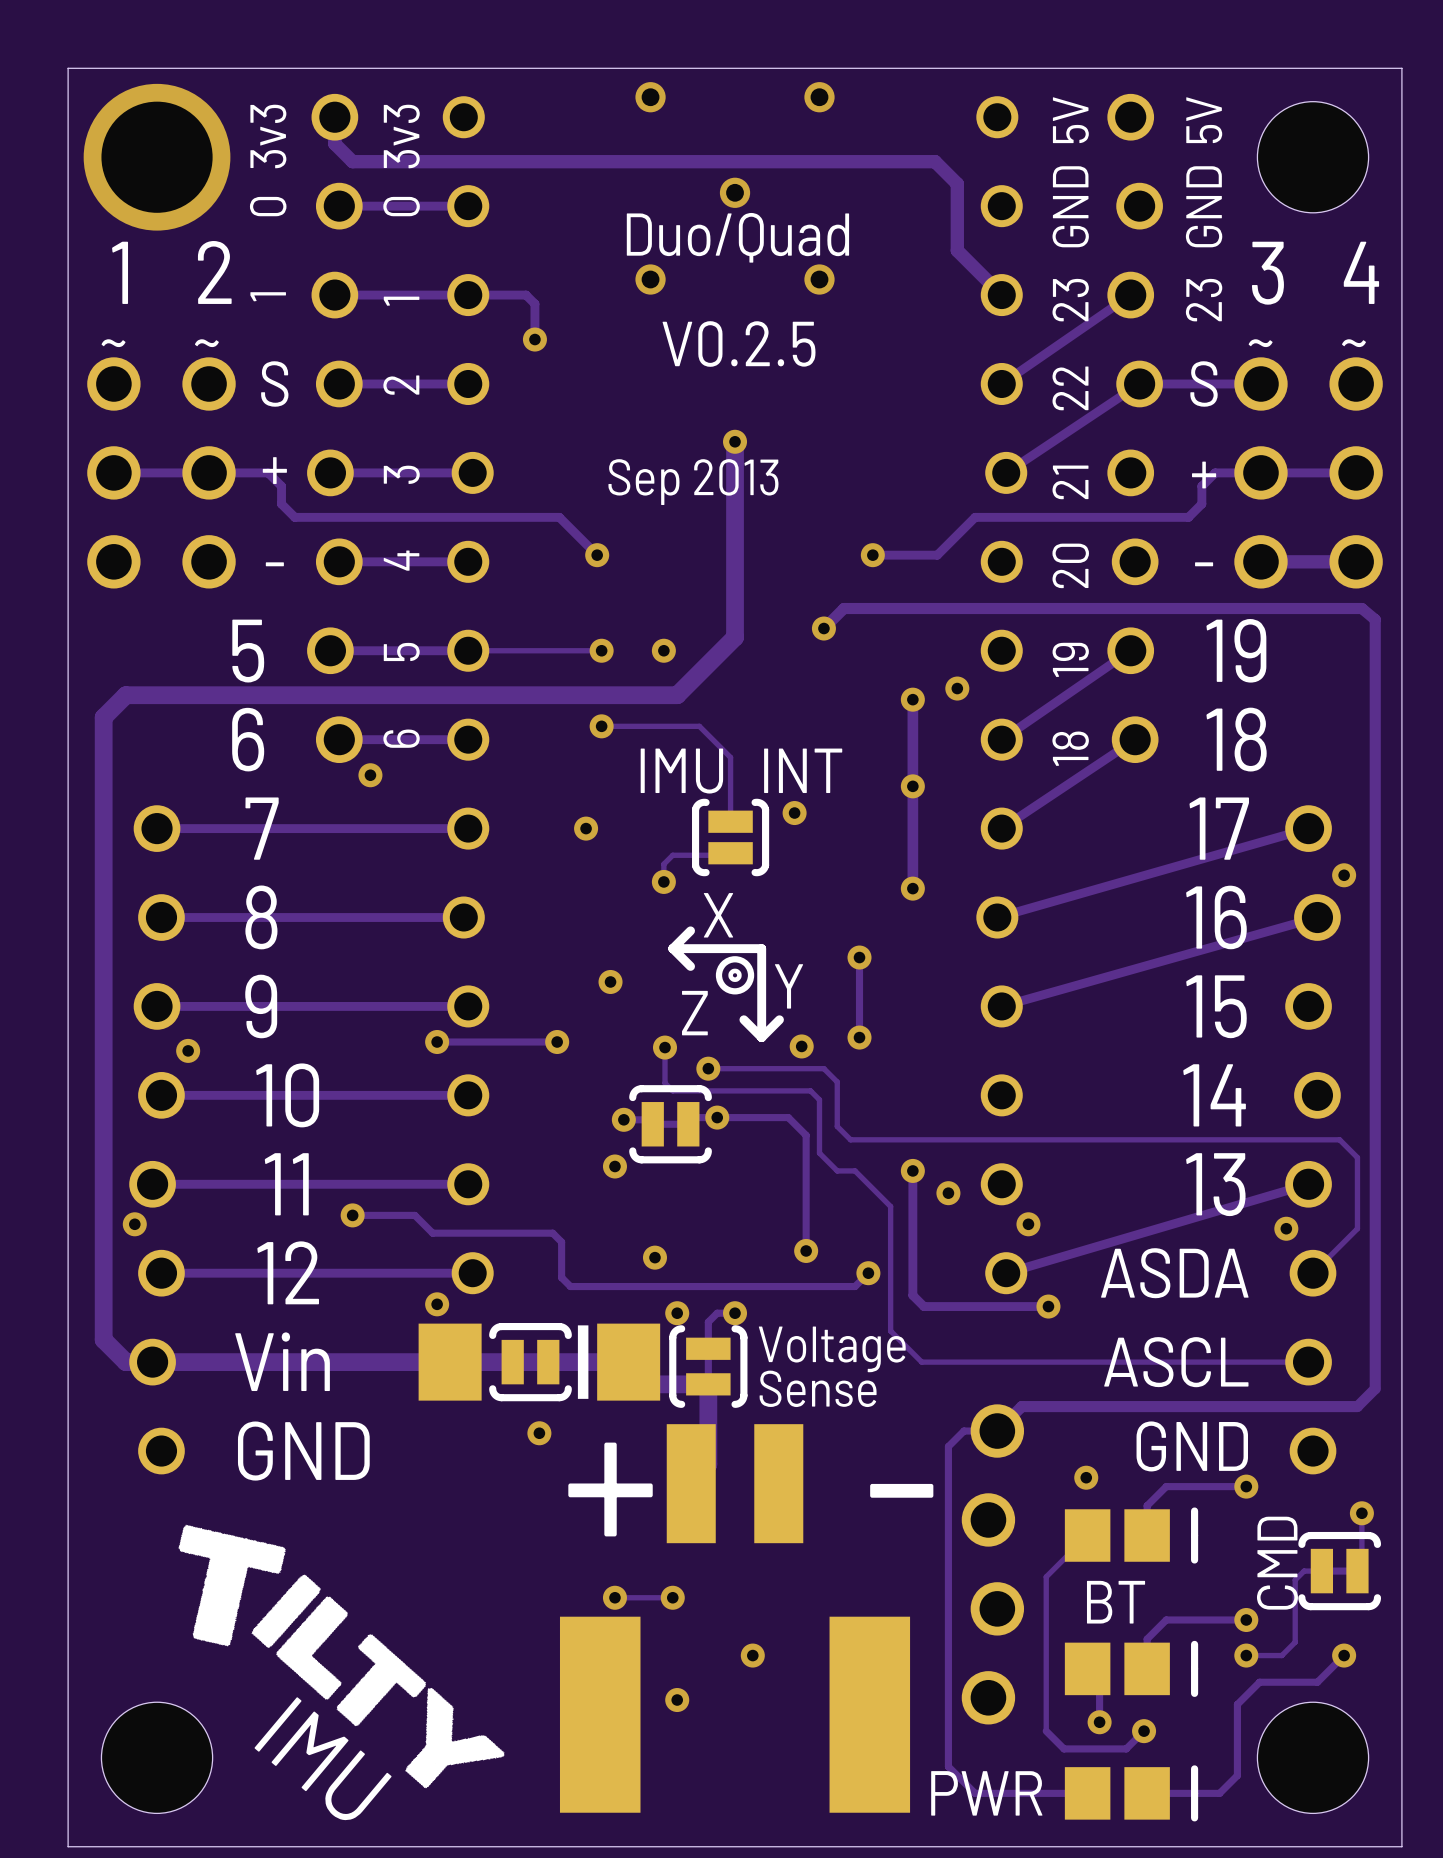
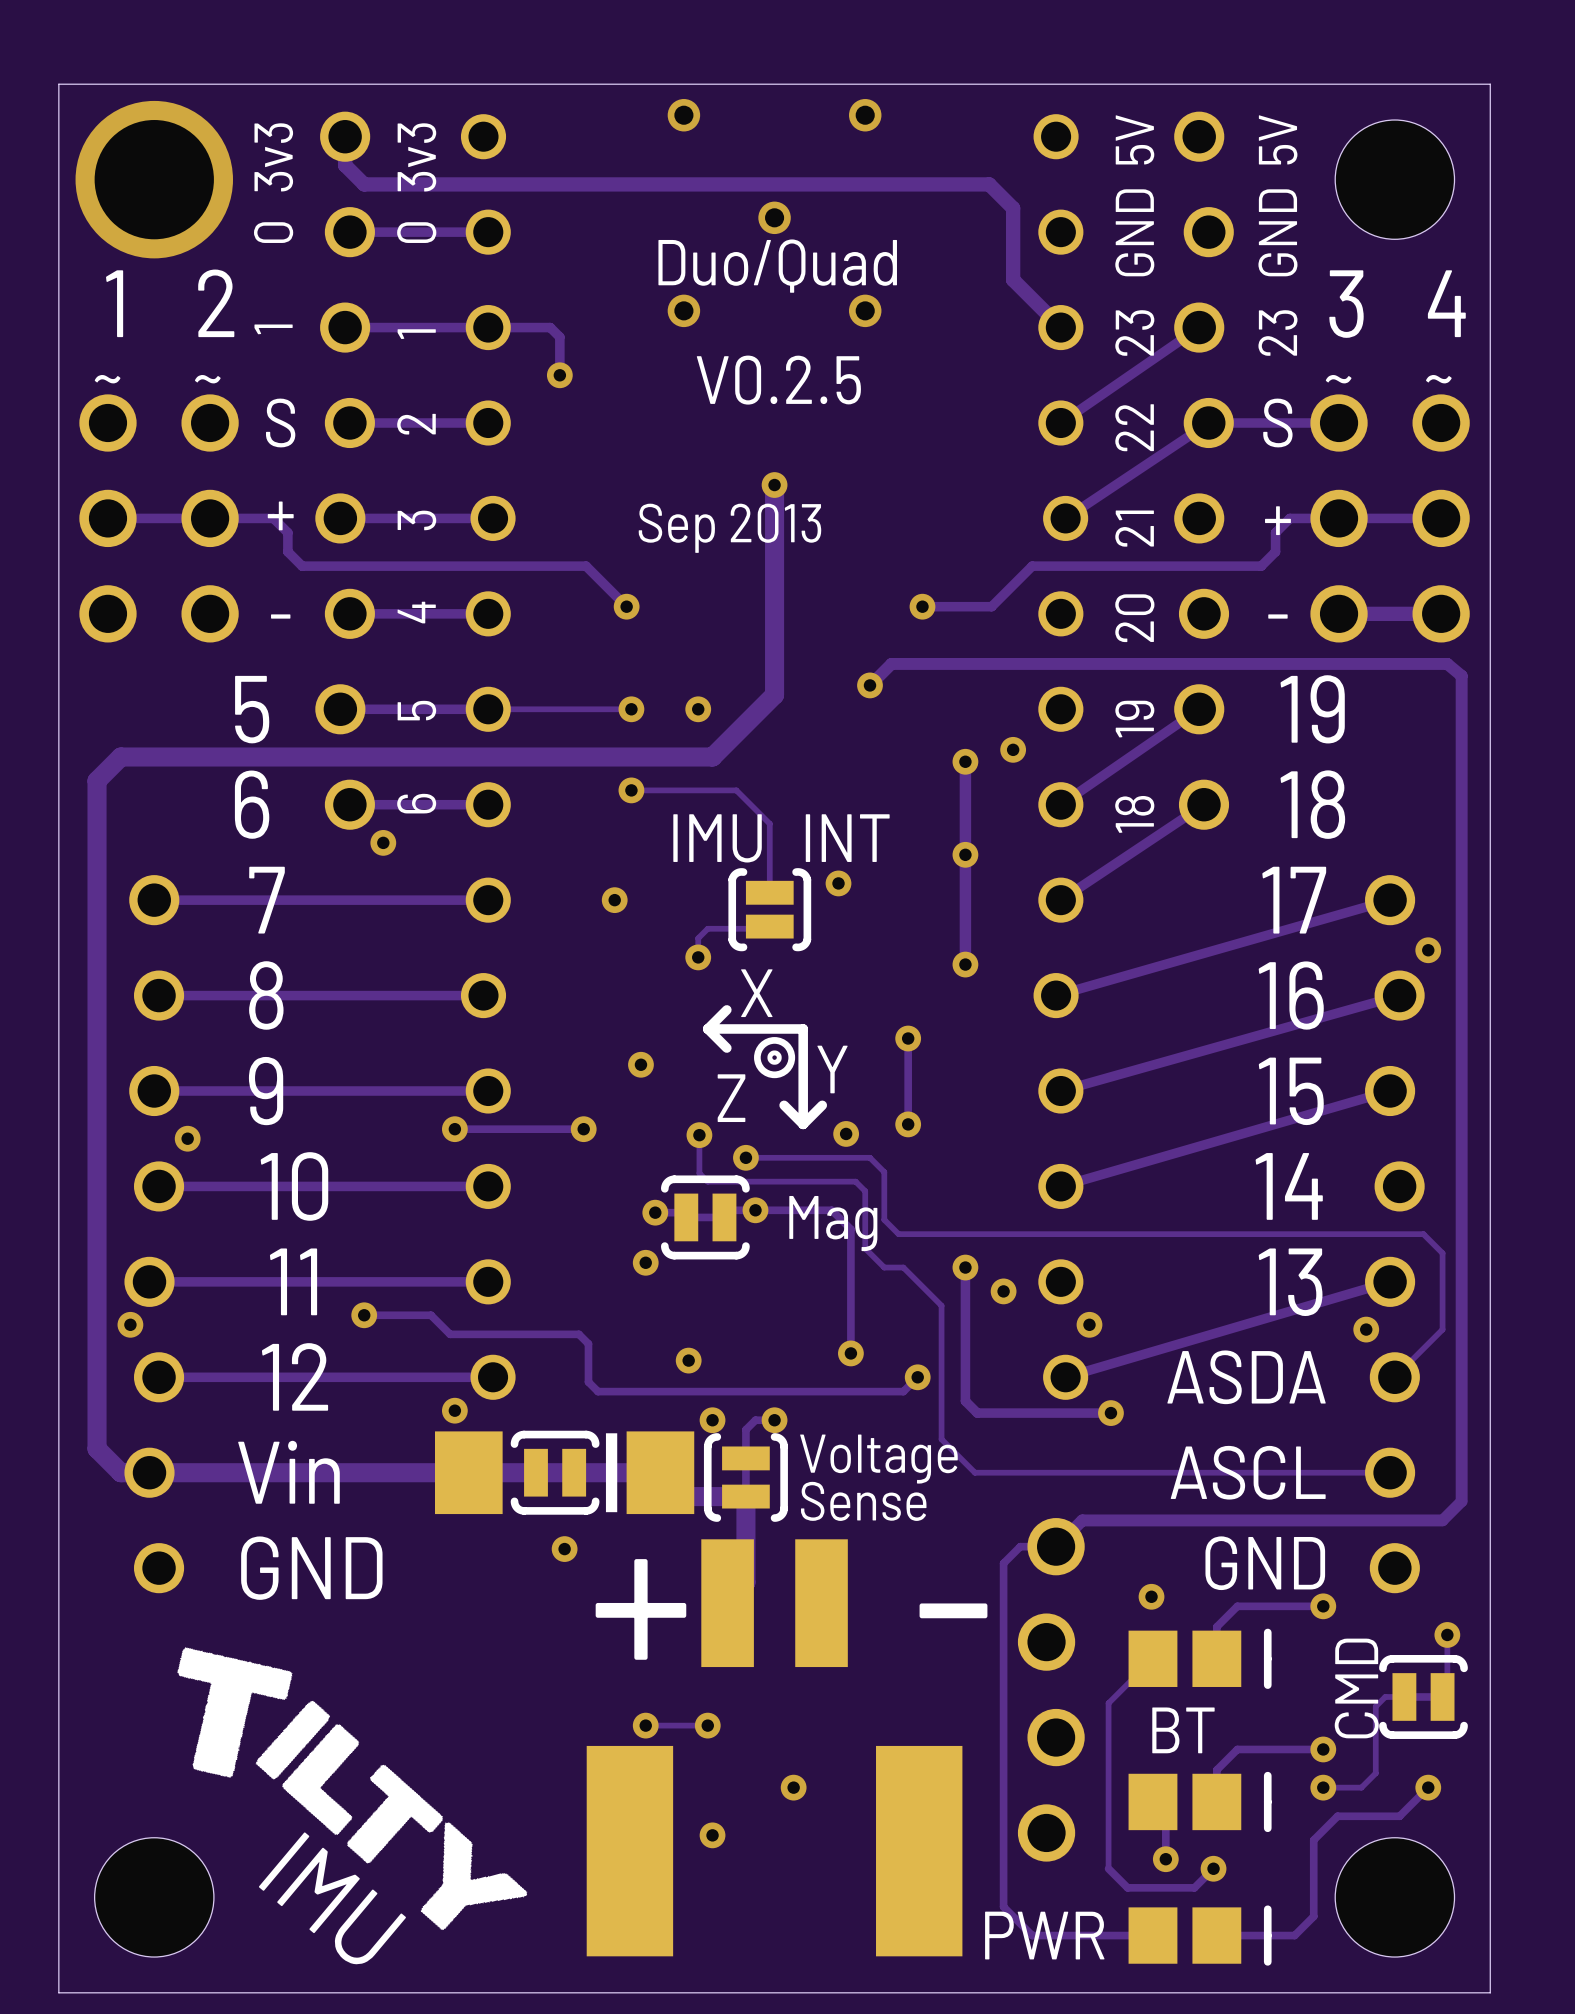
track: none -> (1390, 1091) (1060, 1186)
text: none -> Mag (833, 1223)

